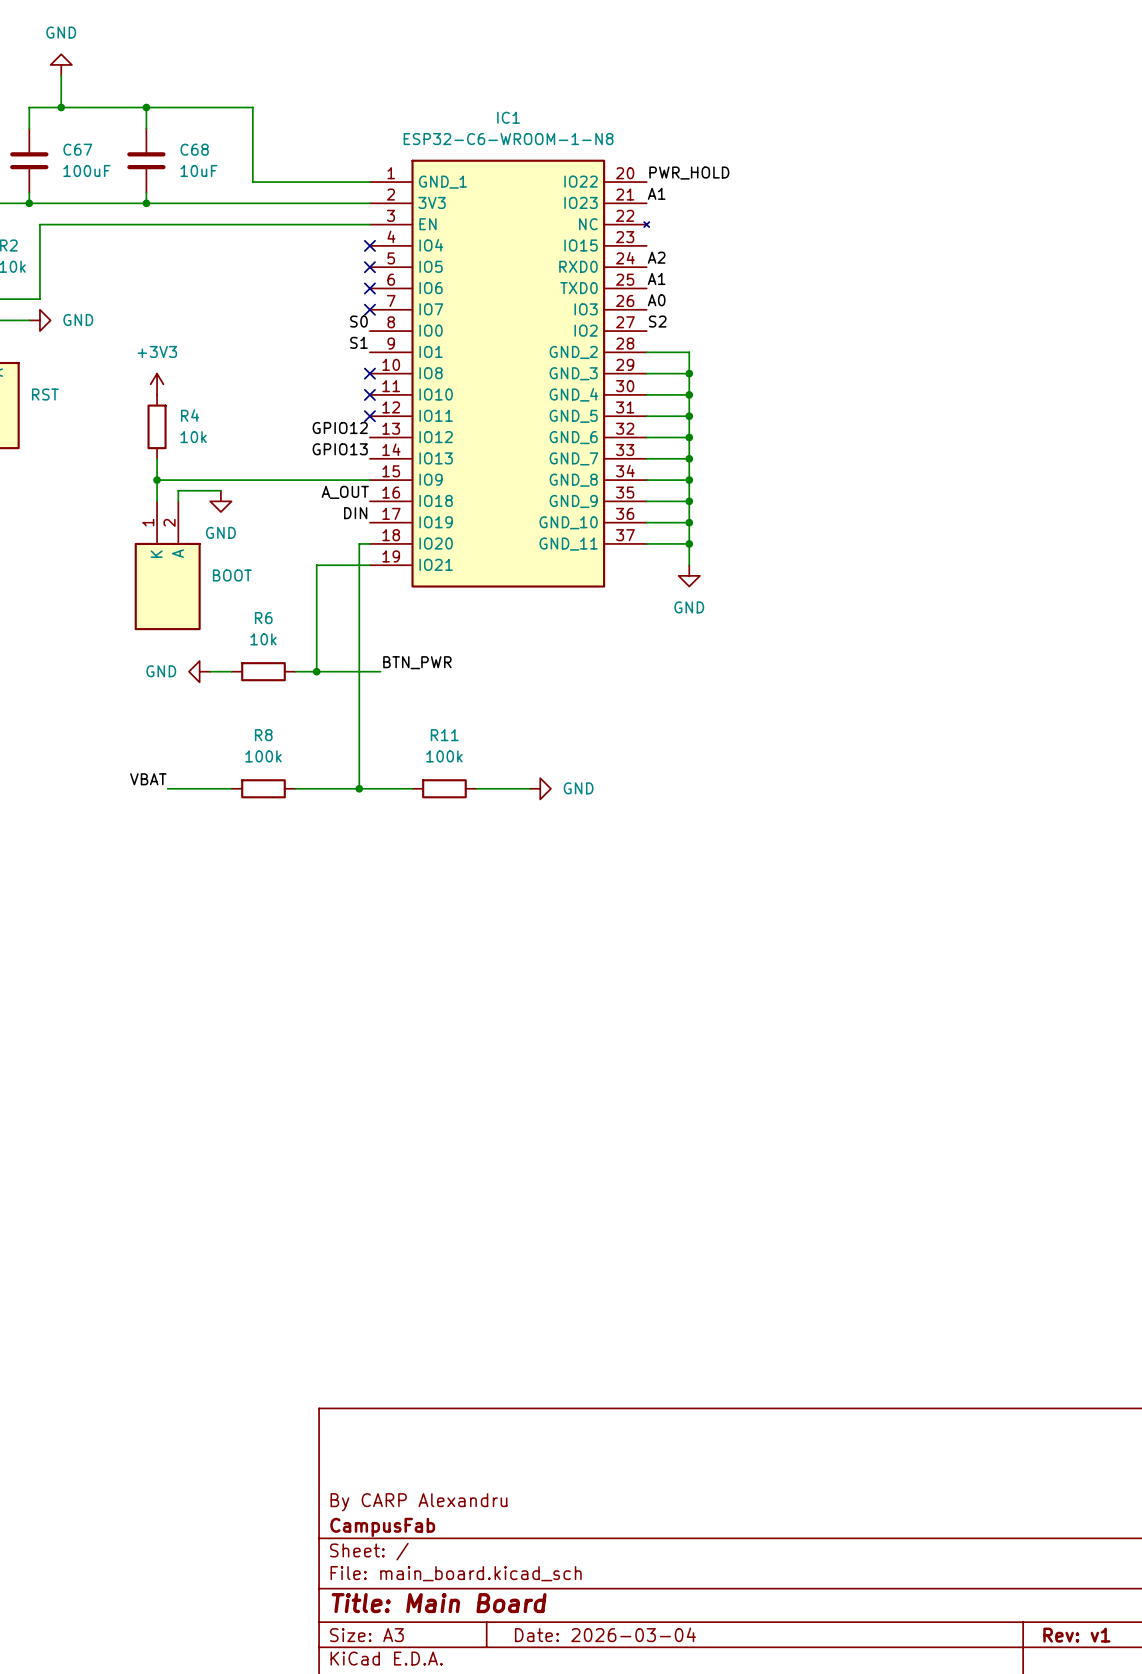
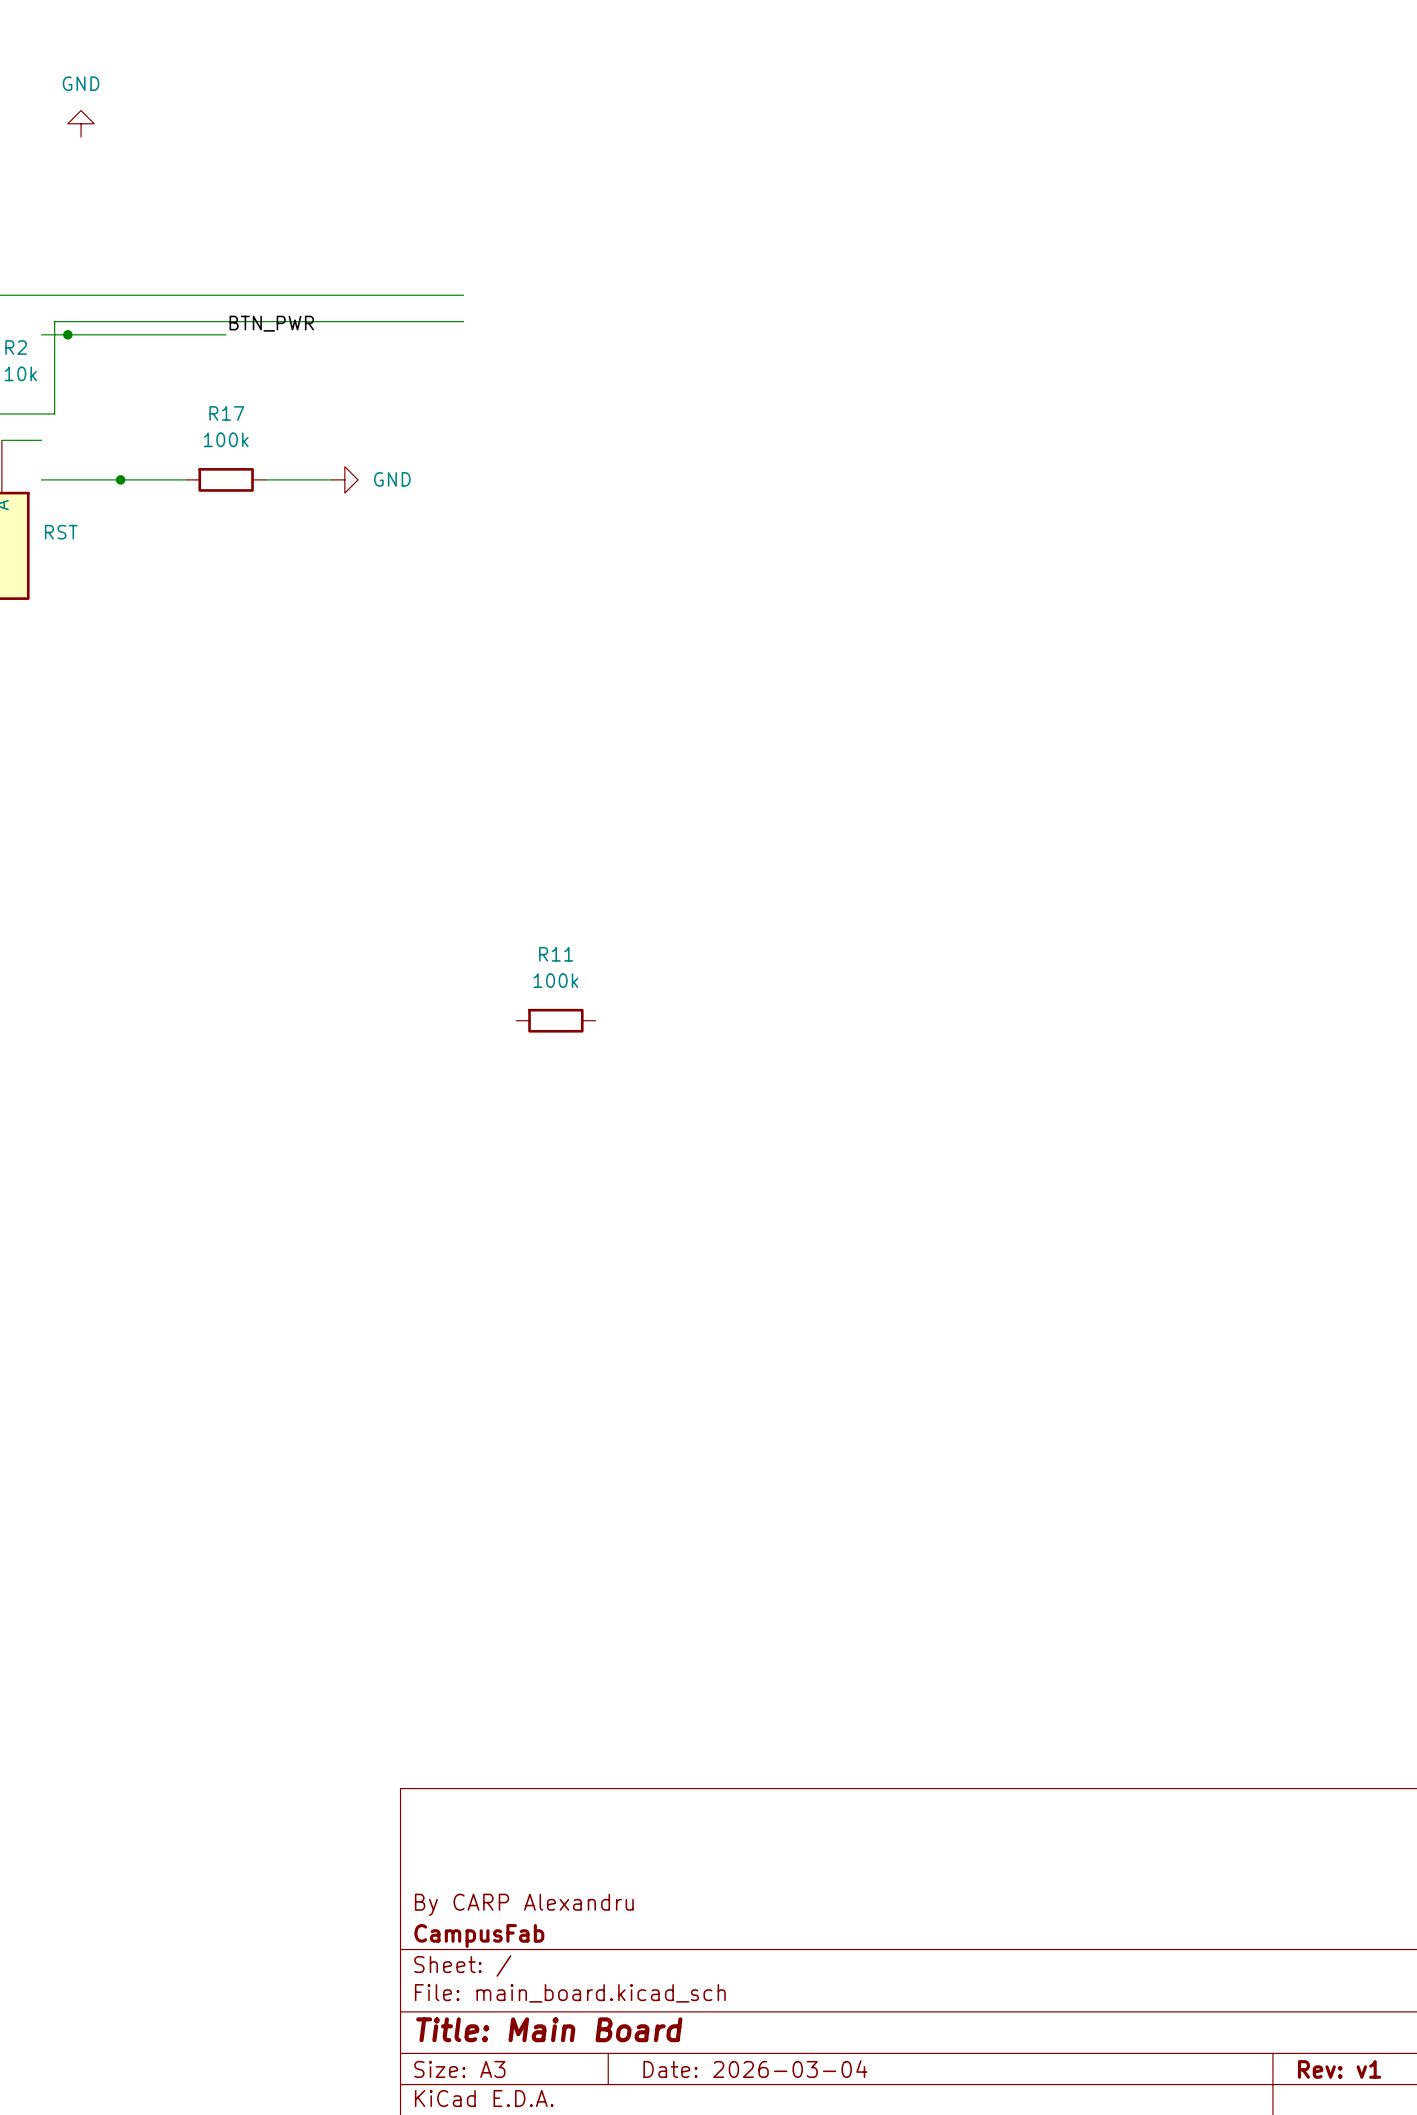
wire: (61, 75) (61, 107) -> none
junction: (61, 107) -> none
wire: (146, 107) (146, 128) -> none
junction: (146, 107) -> none
wire: (29, 128) (29, 107) (252, 107) (252, 182) (369, 182) -> none
C67: 100uF (29, 160) -> none
C68: 10uF (146, 160) -> none
label: PWR_HOLD (689, 173) -> none
wire: (29, 192) (29, 203) -> none
wire: (146, 192) (146, 203) -> none
label: A1 (656, 193) -> none
junction position: (29, 203) -> (67, 334)
junction: (146, 203) -> none
label: none -> BTN_PWR (271, 323)
wire: none -> (41, 334) (226, 334)
no-connect mark: (369, 245) -> none
label: A2 (656, 257) -> none
no-connect mark: (369, 267) -> none
label: A1 (656, 278) -> none
no-connect mark: (369, 288) -> none
label: A0 (656, 300) -> none
no-connect mark: (369, 309) -> none
power symbol: GND (39, 320) -> none
label: S0 (358, 321) -> none
label: S2 (657, 321) -> none
label: S1 (358, 342) -> none
wire: none -> (41, 479) (186, 479)
junction: none -> (120, 479)
R17: none -> 100k (226, 479)
wire: none -> (265, 479) (331, 479)
power symbol: none -> GND (344, 479)
wire: (646, 352) (689, 352) (689, 565) -> none
no-connect mark: (369, 373) -> none
IC1: ESP32-C6-WROOM-1-N8 (509, 373) -> none
wire: (646, 373) (689, 373) -> none
junction: (689, 373) -> none
power symbol: +3V3 (157, 384) -> none
no-connect mark: (369, 394) -> none
wire: (646, 394) (689, 394) -> none
junction: (689, 394) -> none
no-connect mark: (369, 416) -> none
wire: (646, 416) (689, 416) -> none
junction: (689, 416) -> none
R4: 10k (157, 426) -> none
label: GPIO12 (340, 428) -> none
wire: (646, 437) (689, 437) -> none
junction: (689, 437) -> none
label: GPIO13 (340, 449) -> none
wire: (157, 458) (157, 501) -> none
wire: (646, 458) (689, 458) -> none
junction: (689, 458) -> none
wire: (157, 480) (369, 480) -> none
junction: (157, 480) -> none
wire: (646, 480) (689, 480) -> none
junction: (689, 480) -> none
wire: (220, 490) (178, 490) (178, 501) -> none
label: A_OUT (345, 492) -> none
power symbol: GND (220, 501) -> none
wire: (646, 501) (689, 501) -> none
junction: (689, 501) -> none
label: DIN (355, 513) -> none
wire: (646, 522) (689, 522) -> none
junction: (689, 522) -> none
wire: (369, 543) (359, 543) (359, 788) -> none
wire: (646, 543) (689, 543) -> none
junction: (689, 543) -> none
BOOT: (167, 565) -> none
wire: (369, 565) (316, 565) (316, 671) -> none
power symbol: GND (689, 575) -> none
label: BTN_PWR (417, 662) -> none
power symbol: GND (199, 671) -> none
wire: (210, 671) (231, 671) -> none
R6: 10k (263, 671) -> none
wire: (295, 671) (380, 671) -> none
junction: (316, 671) -> none
label: VBAT (148, 779) -> none
wire: (167, 788) (231, 788) -> none
R8: 100k (263, 788) -> none
wire: (295, 788) (412, 788) -> none
junction: (359, 788) -> none
wire: (476, 788) (529, 788) -> none
power symbol: GND (540, 788) -> none

